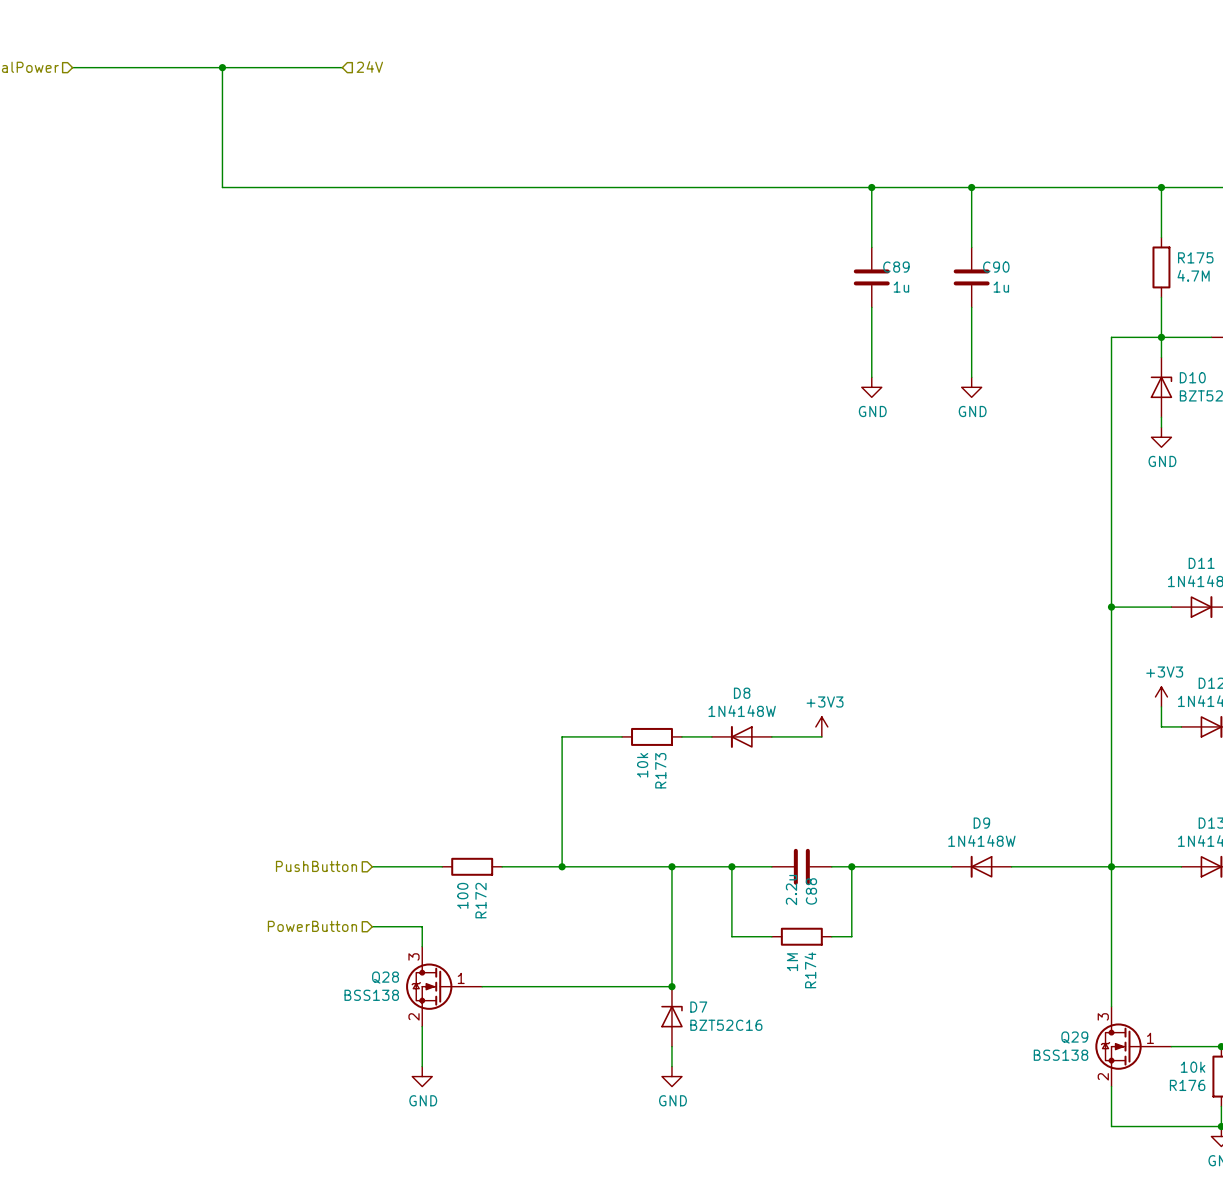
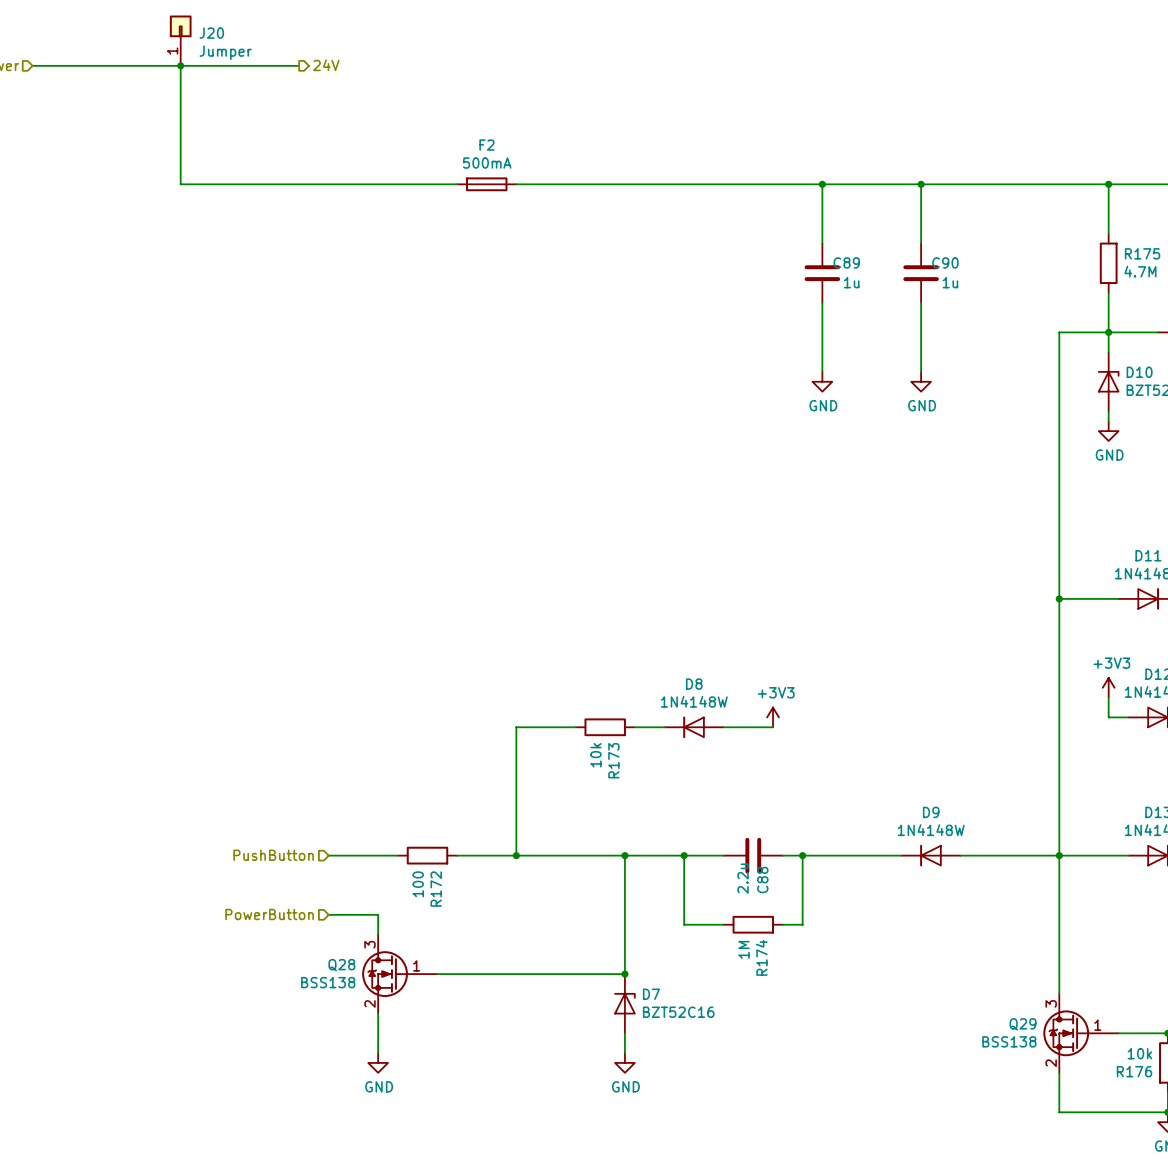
J20: none -> Jumper (180, 40)
hierarchical label shape: input (369, 67) -> output (326, 65)
F2: none -> 500mA (486, 184)

